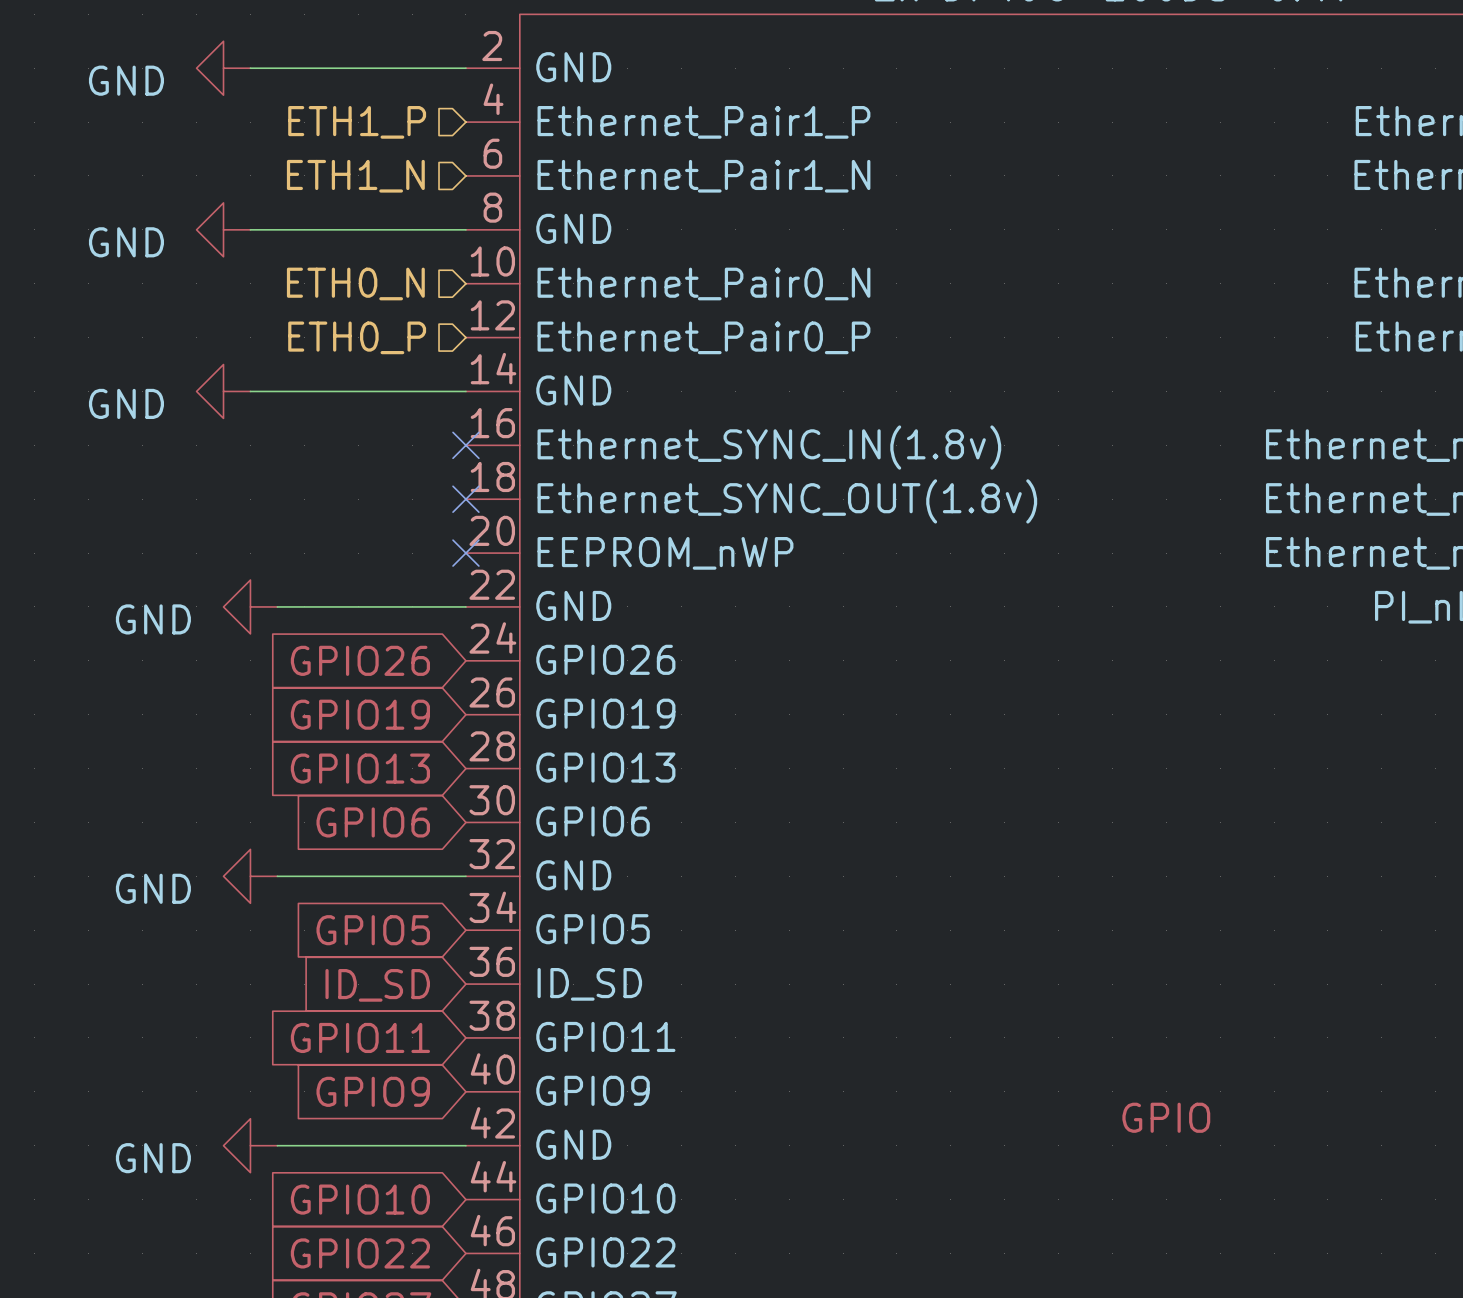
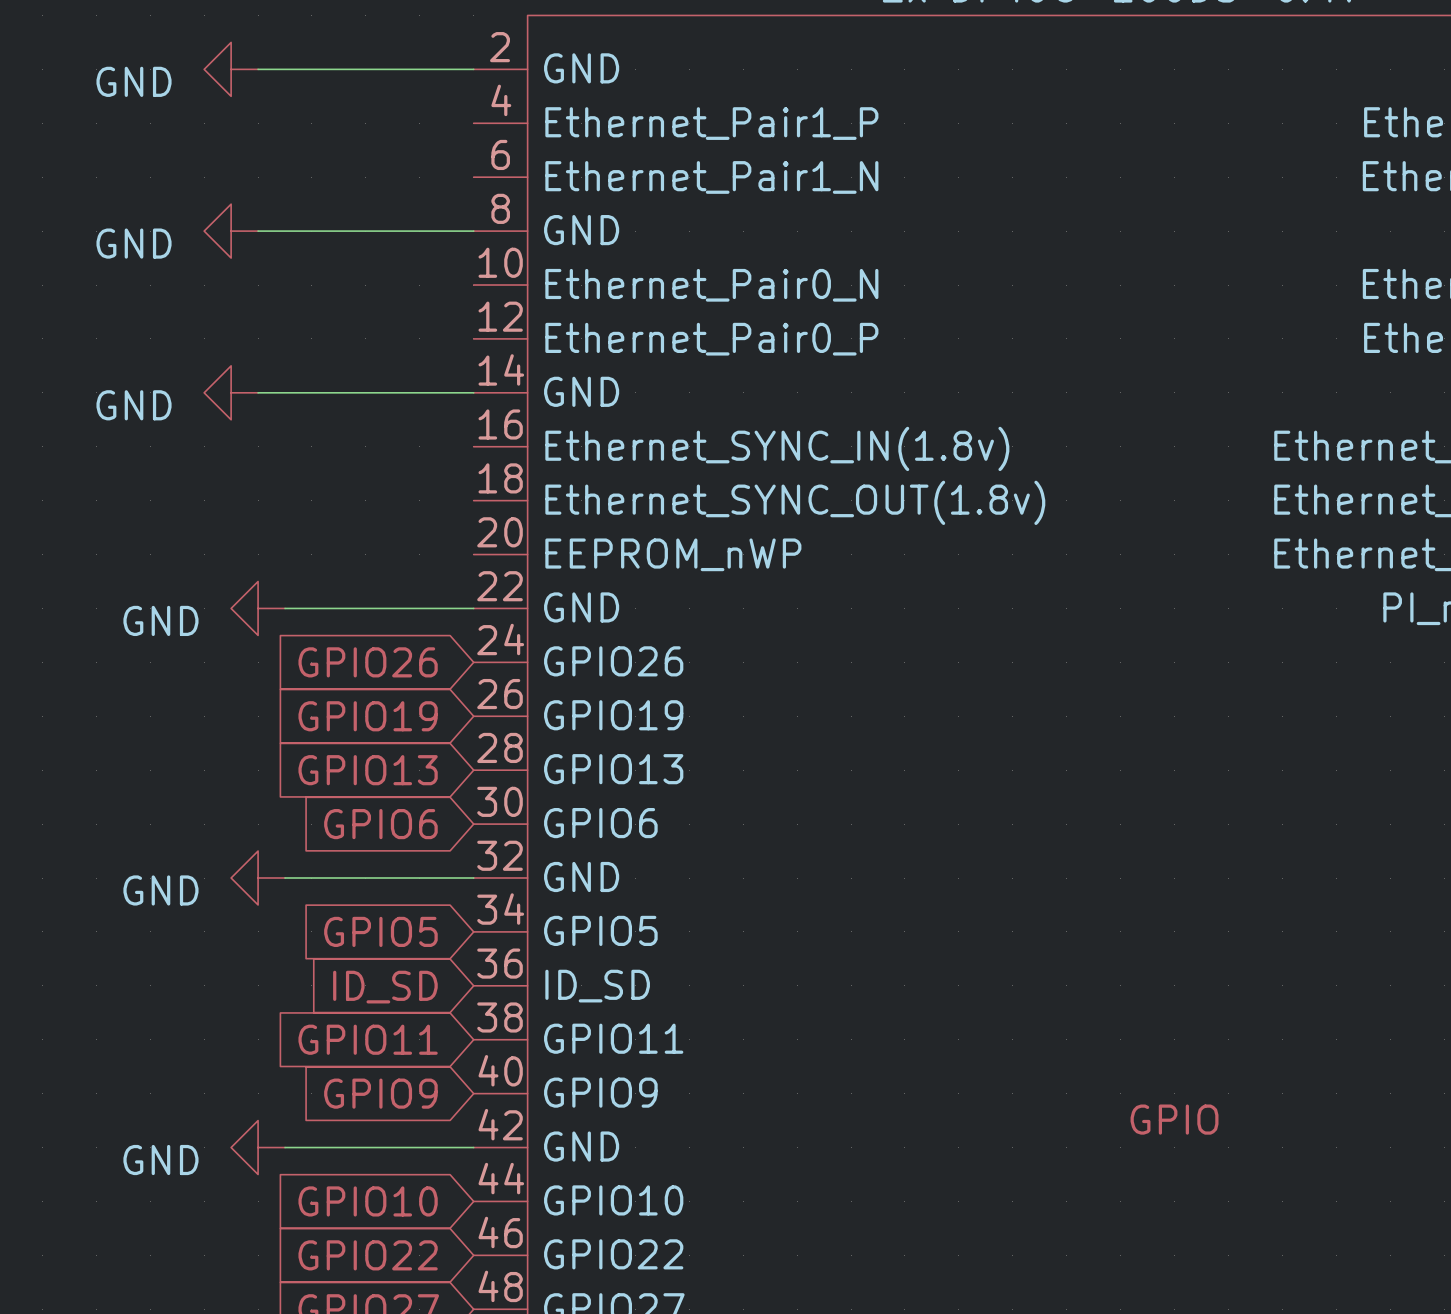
hierarchical label: ETH1_P (357, 122) -> none
hierarchical label: ETH1_N (355, 176) -> none
hierarchical label: ETH0_N (355, 283) -> none
hierarchical label: ETH0_P (357, 337) -> none
no-connect mark: (465, 445) -> none
no-connect mark: (465, 499) -> none
no-connect mark: (465, 553) -> none

